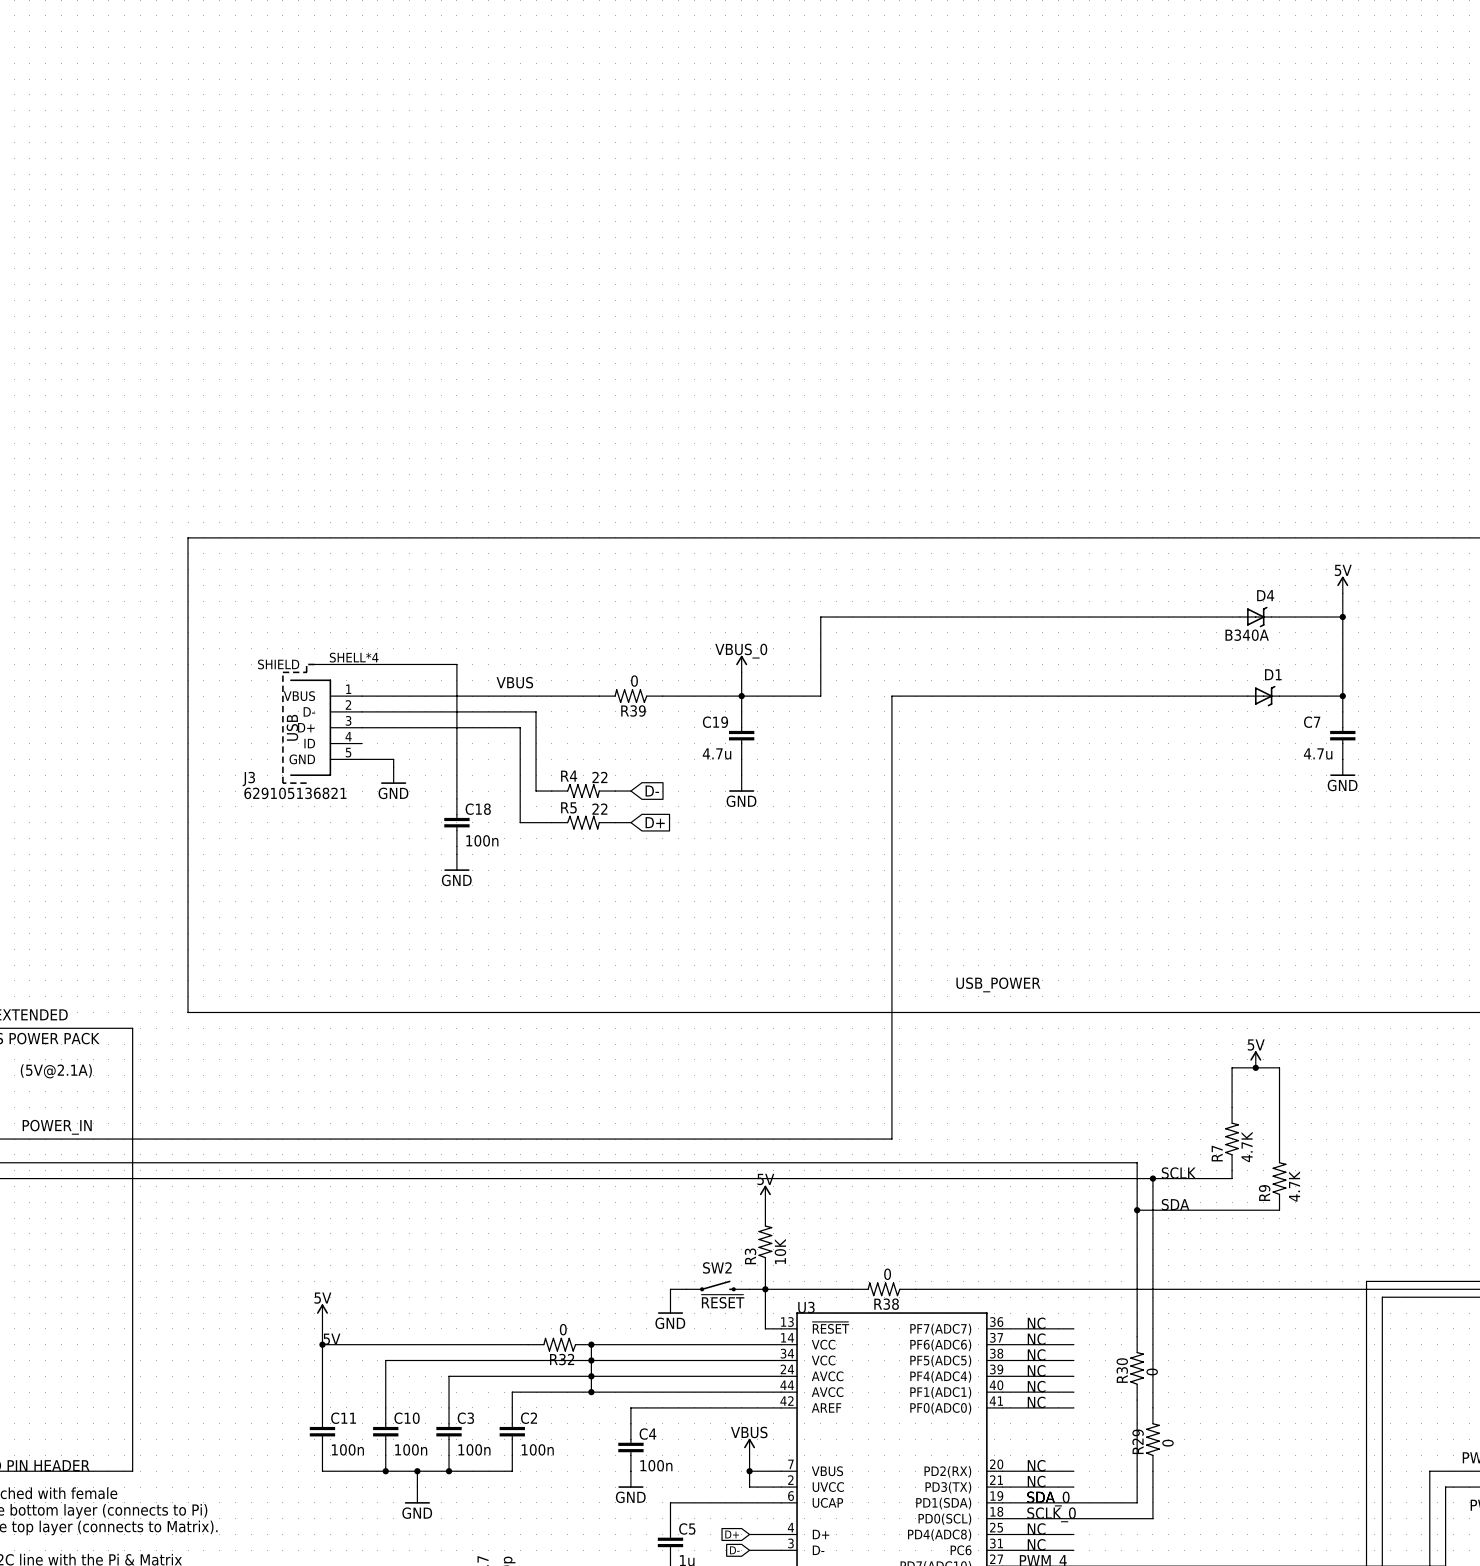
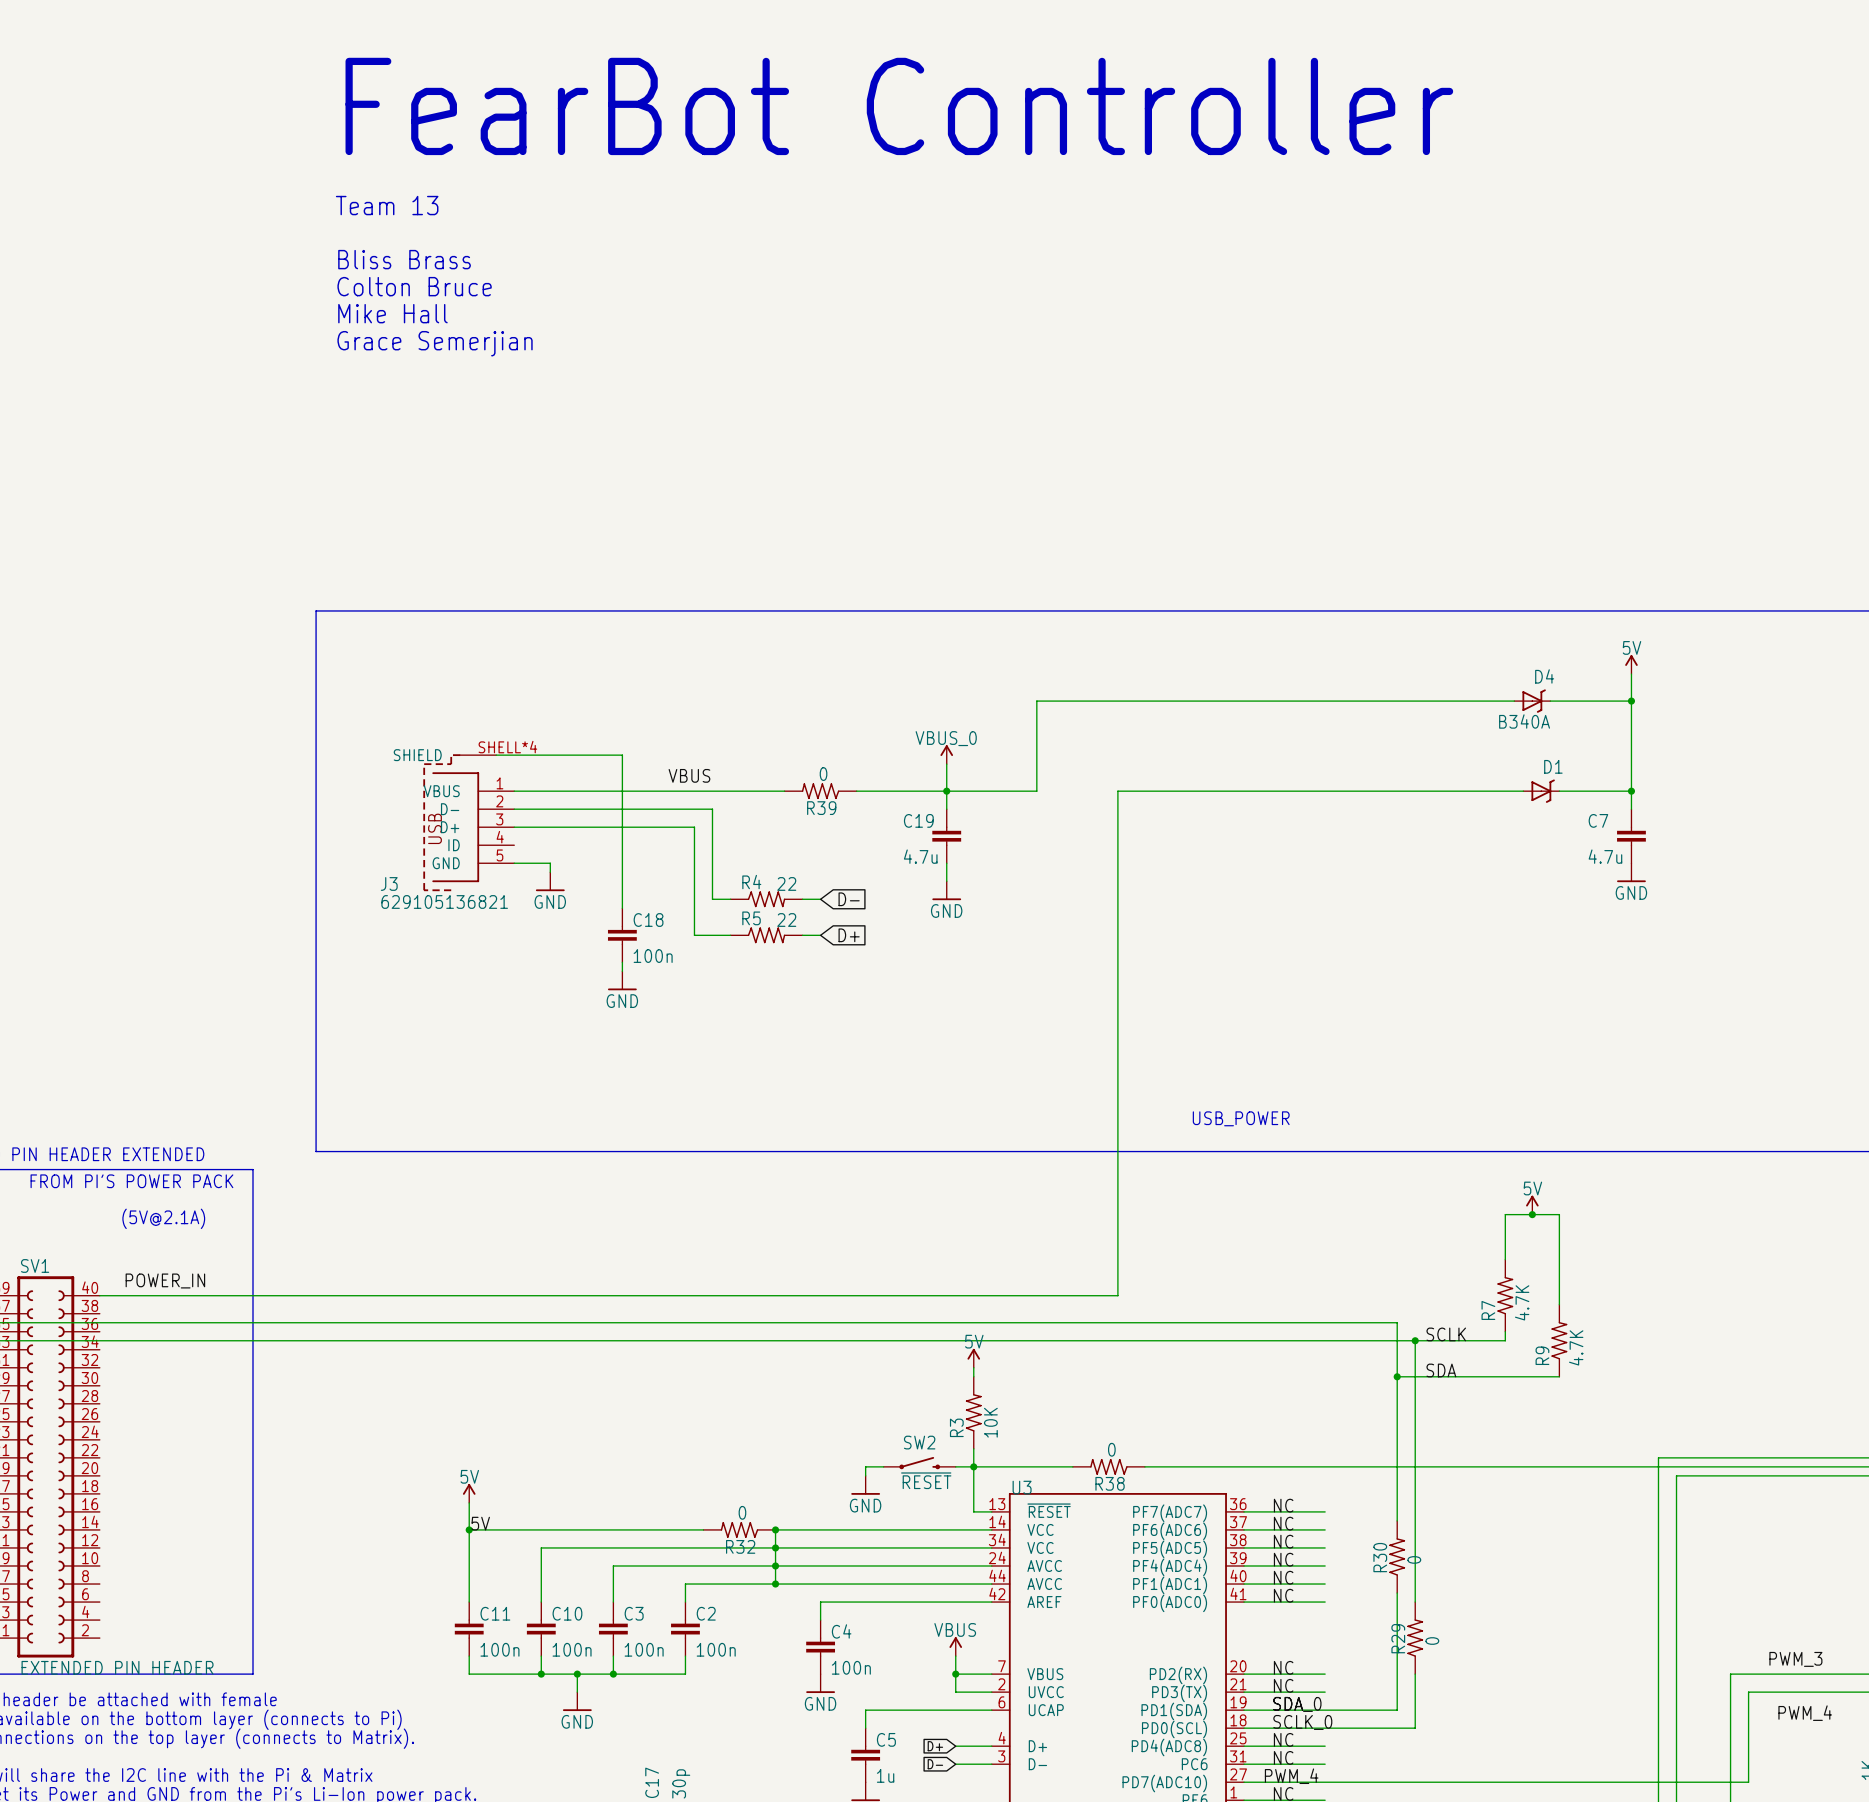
text: none -> FearBot Controller (899, 106)
text: none -> Team 13 (387, 205)
text: none -> Bliss Brass (404, 259)
text: none -> Colton Bruce (414, 286)
text: none -> Mike Hall (392, 313)
text: none -> Grace Semerjian (435, 343)

